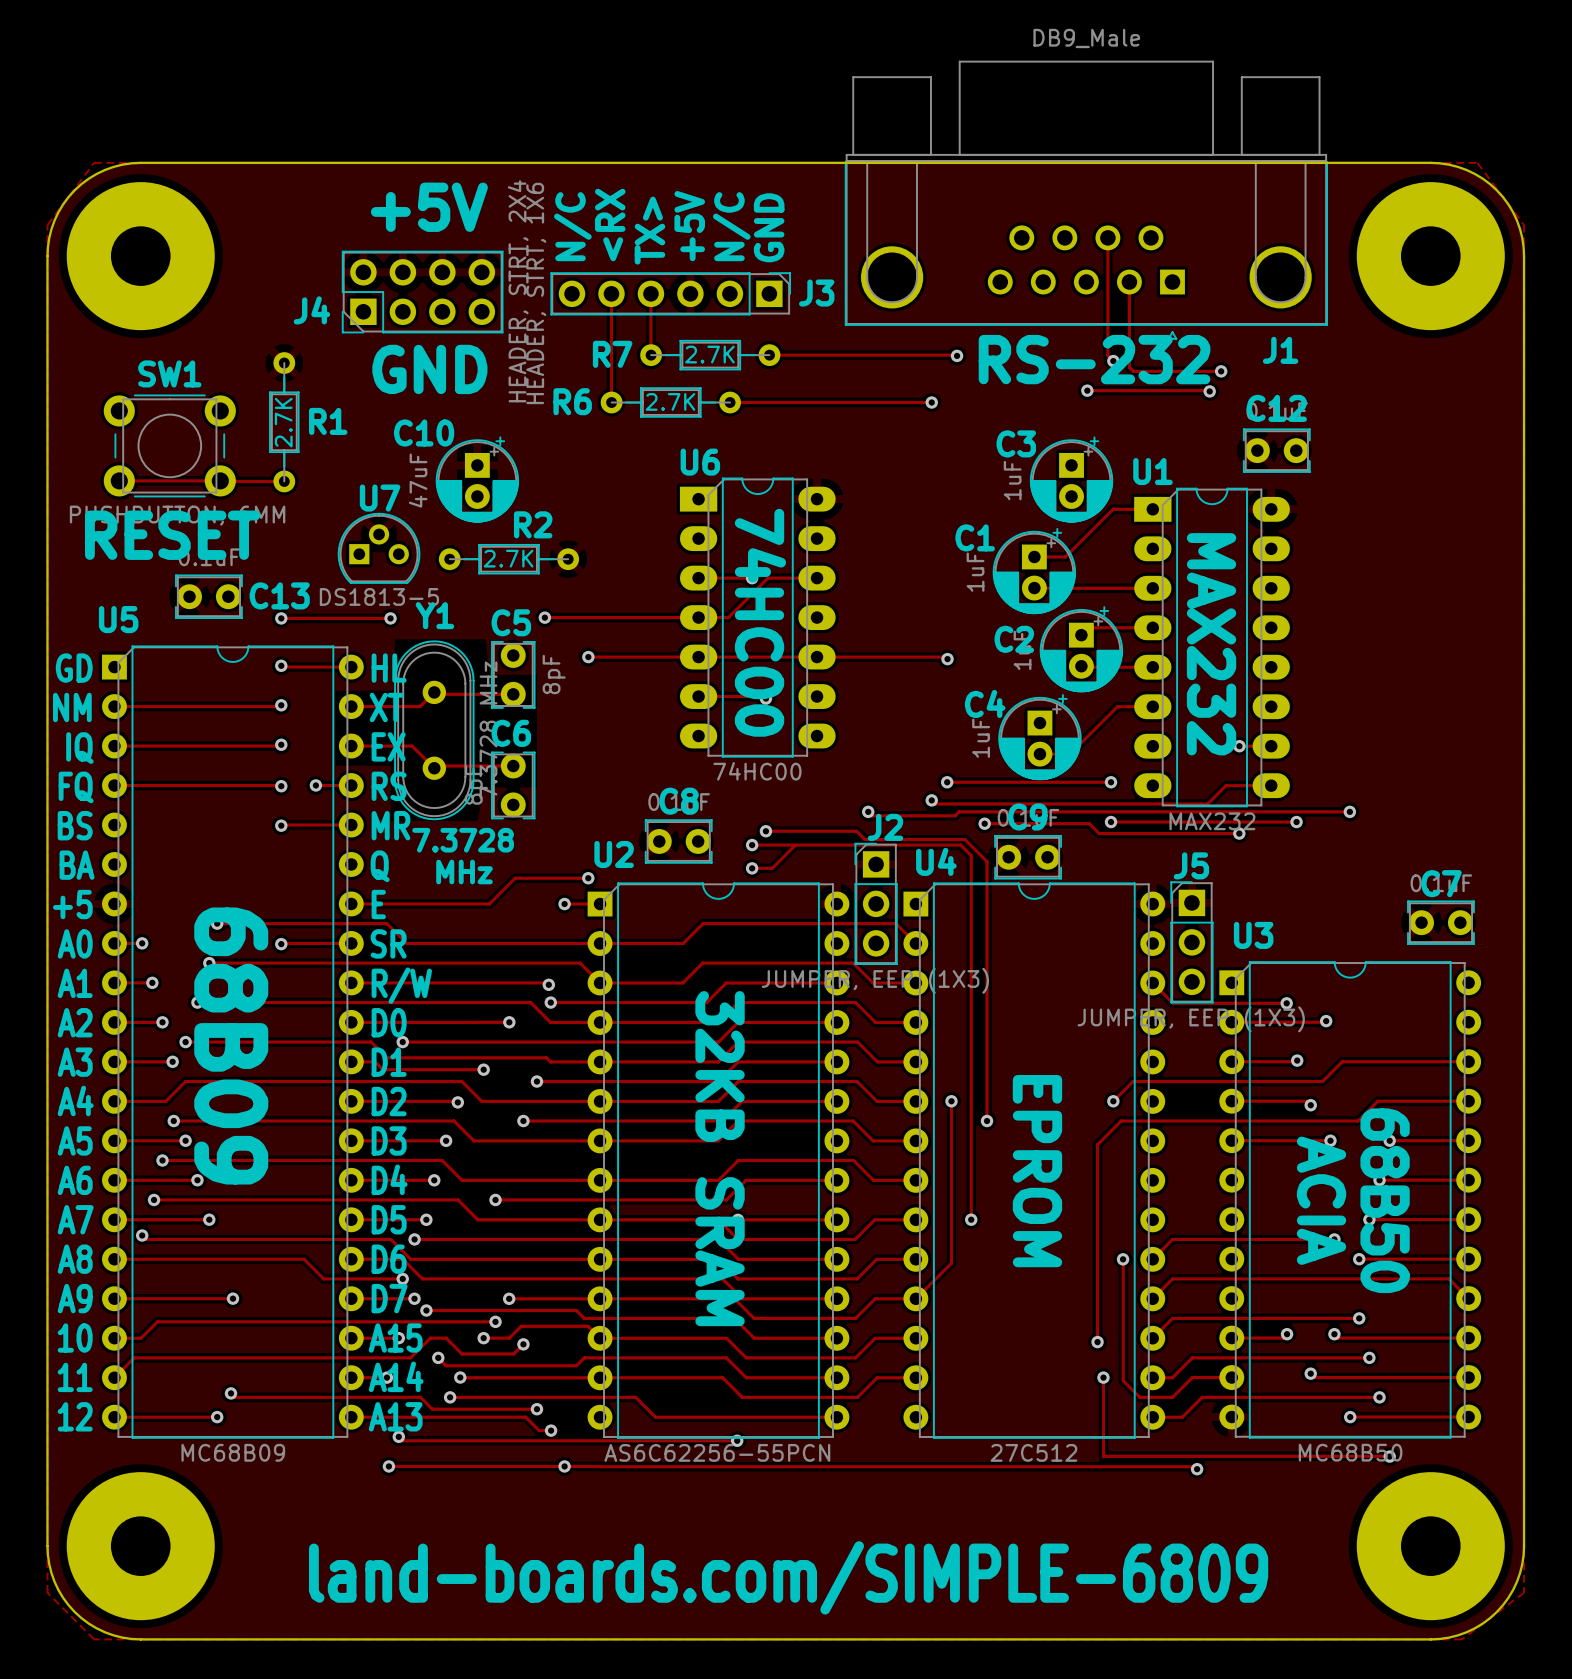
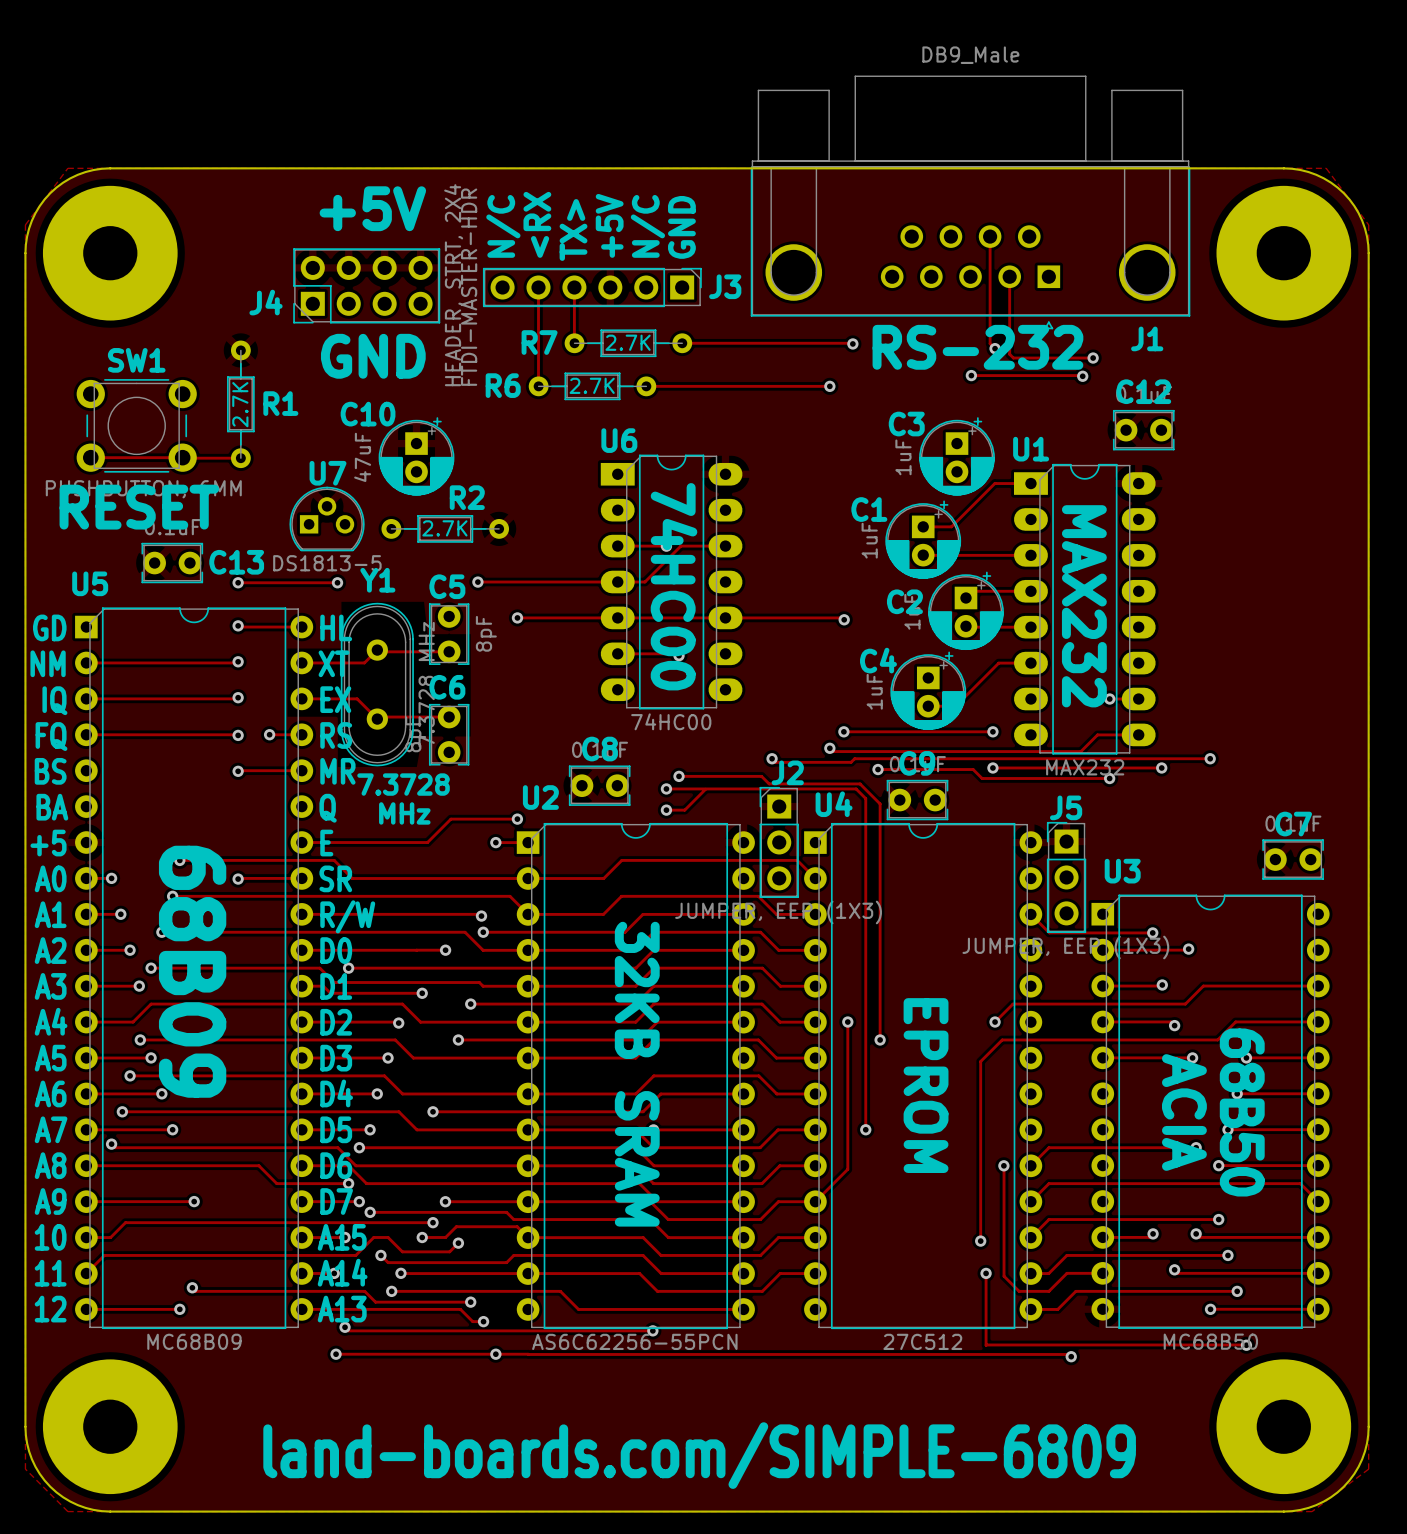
J3 value: HEADER, STRT, 1X6 (536, 293) -> FTDI-MASTER-HDR (469, 287)

